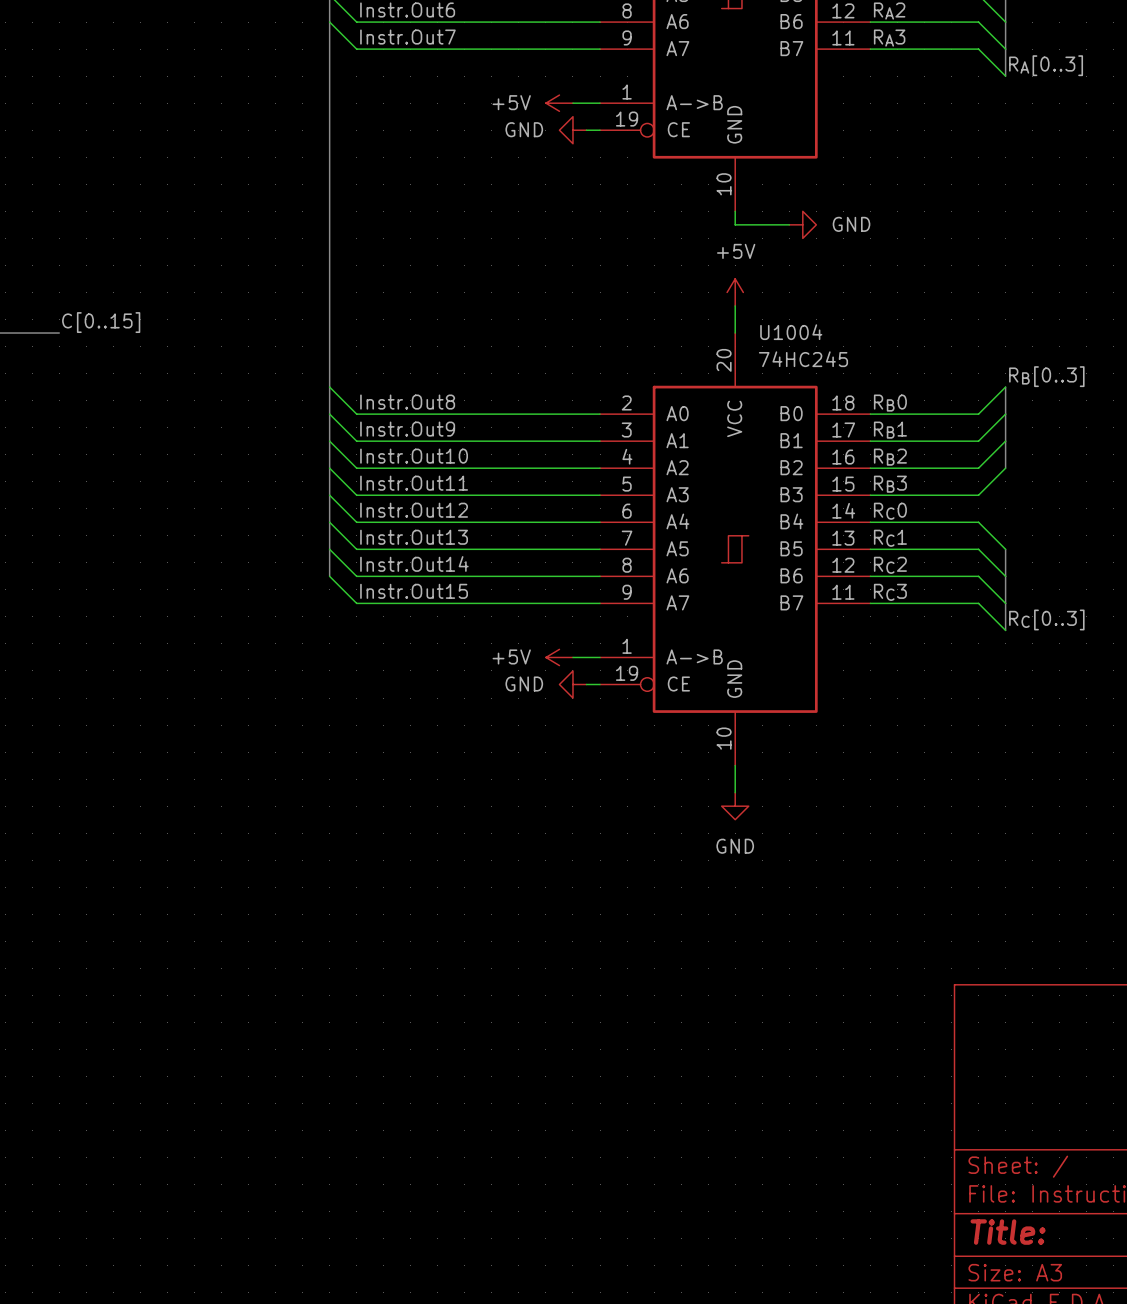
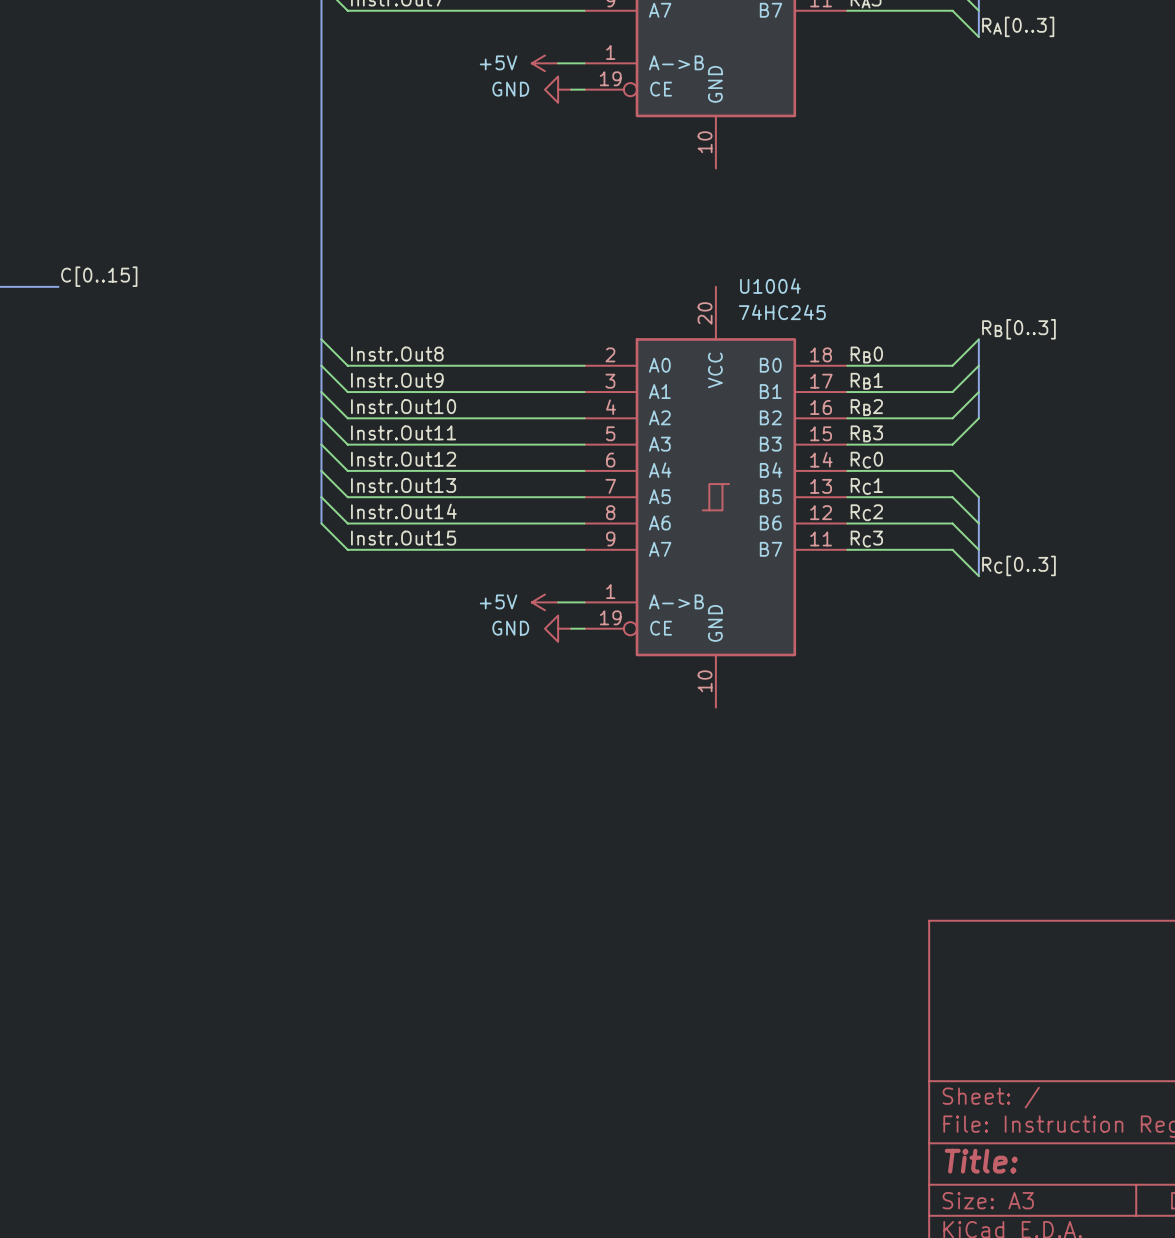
wire: (735, 211) (735, 224) (789, 224) -> none
power symbol: GND (802, 224) -> none
power symbol: +5V (735, 292) -> none
wire: (735, 305) (735, 333) -> none
wire: (735, 765) (735, 792) -> none
power symbol: GND (735, 806) -> none

